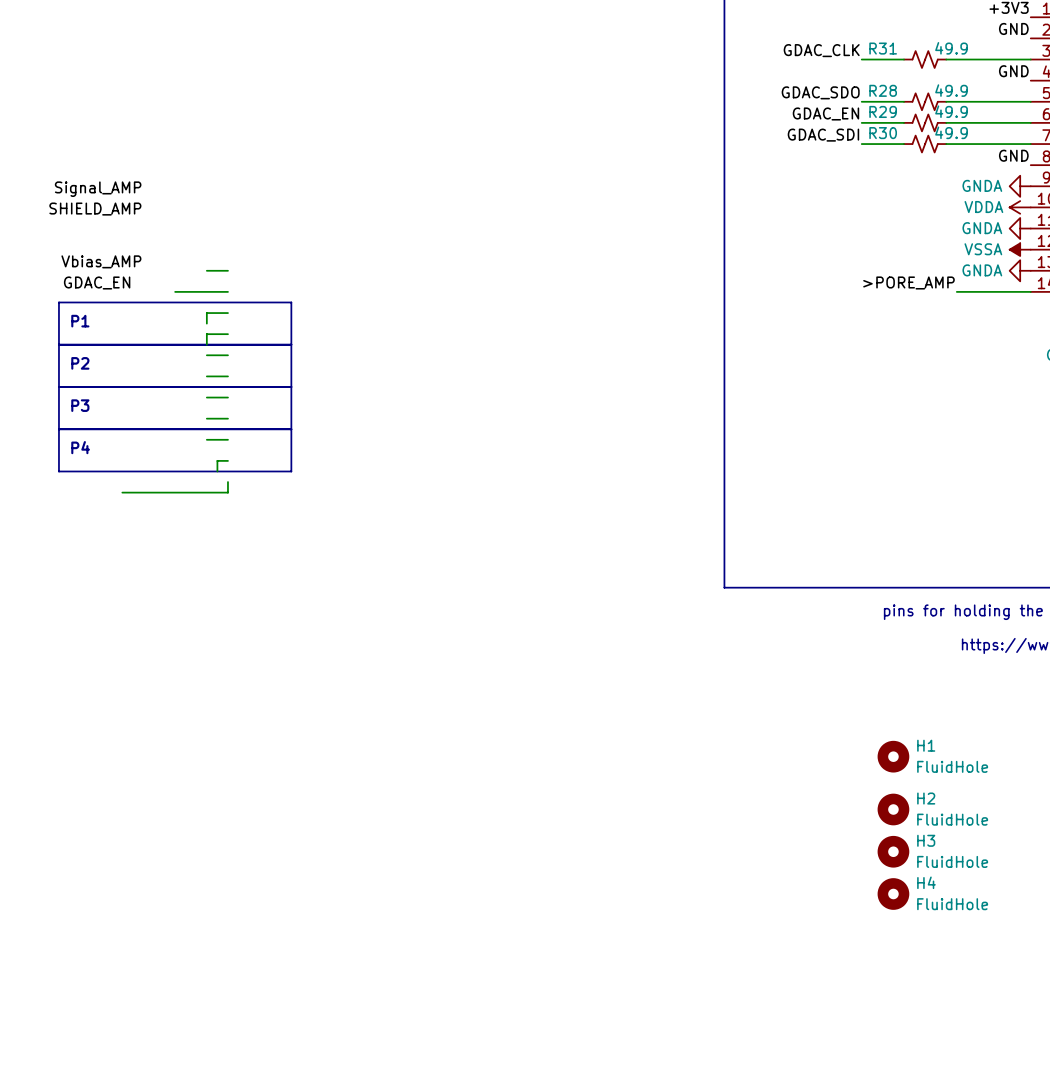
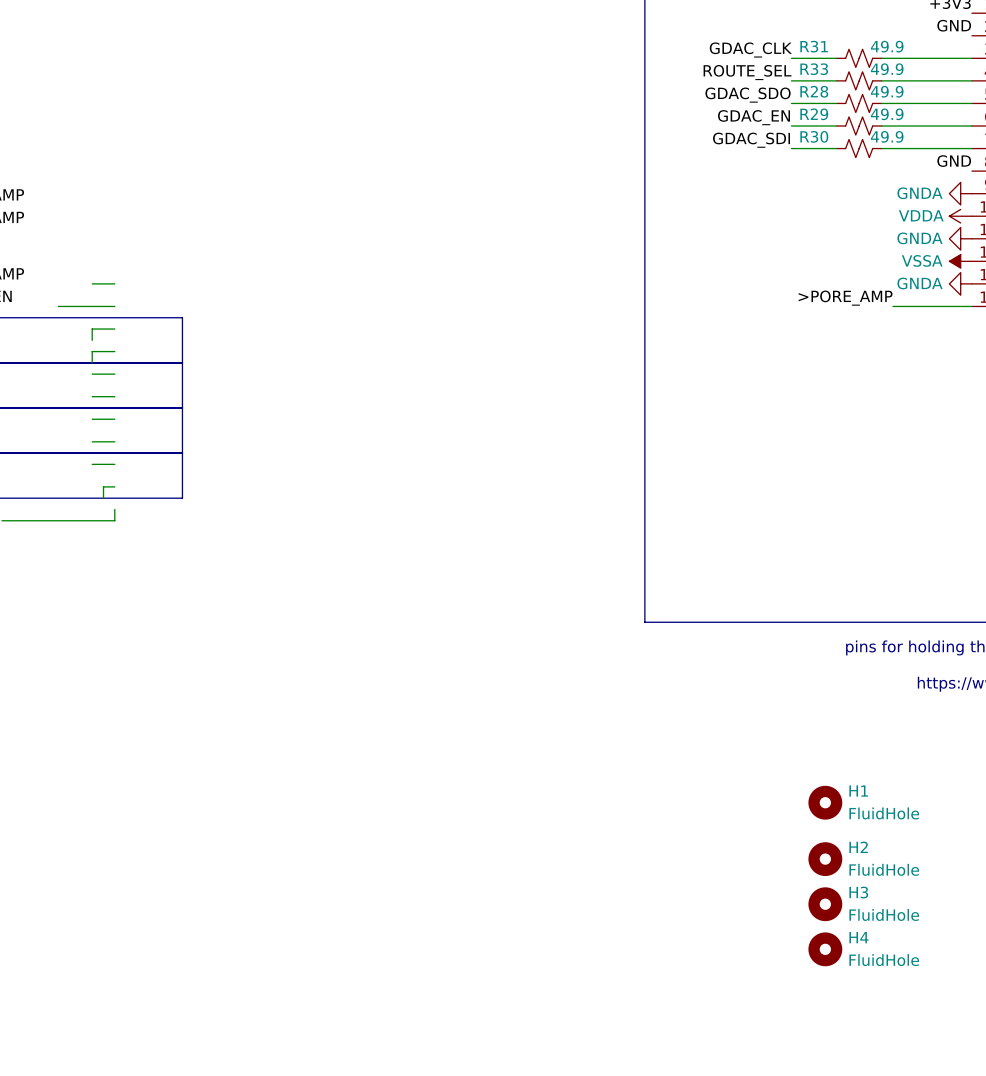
label: none -> ROUTE_SEL (747, 72)
label: GND (1013, 71) -> none
wire: none -> (791, 80) (836, 80)
R33: none -> 49.9 (859, 80)
wire: none -> (881, 80) (971, 80)

